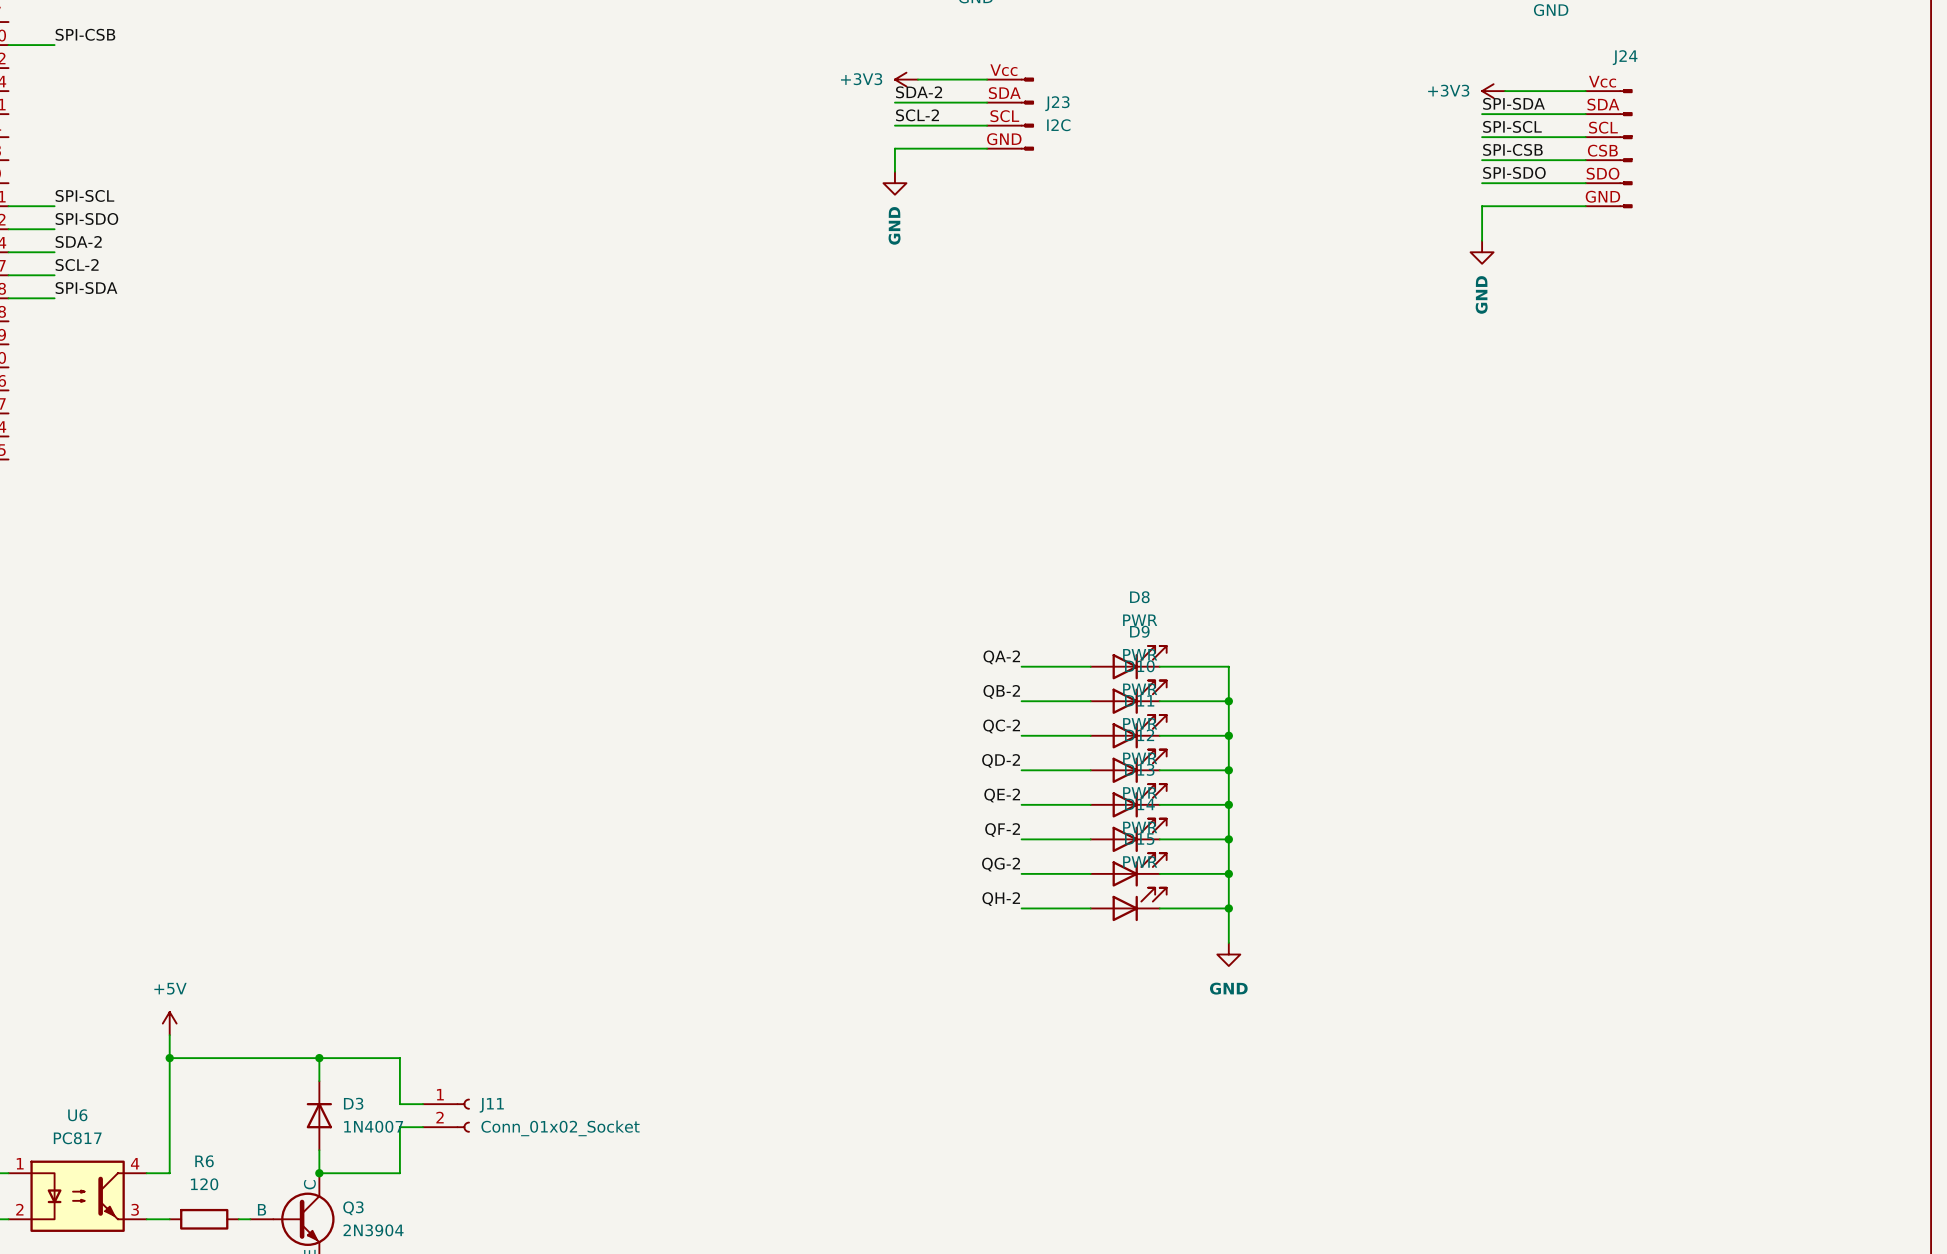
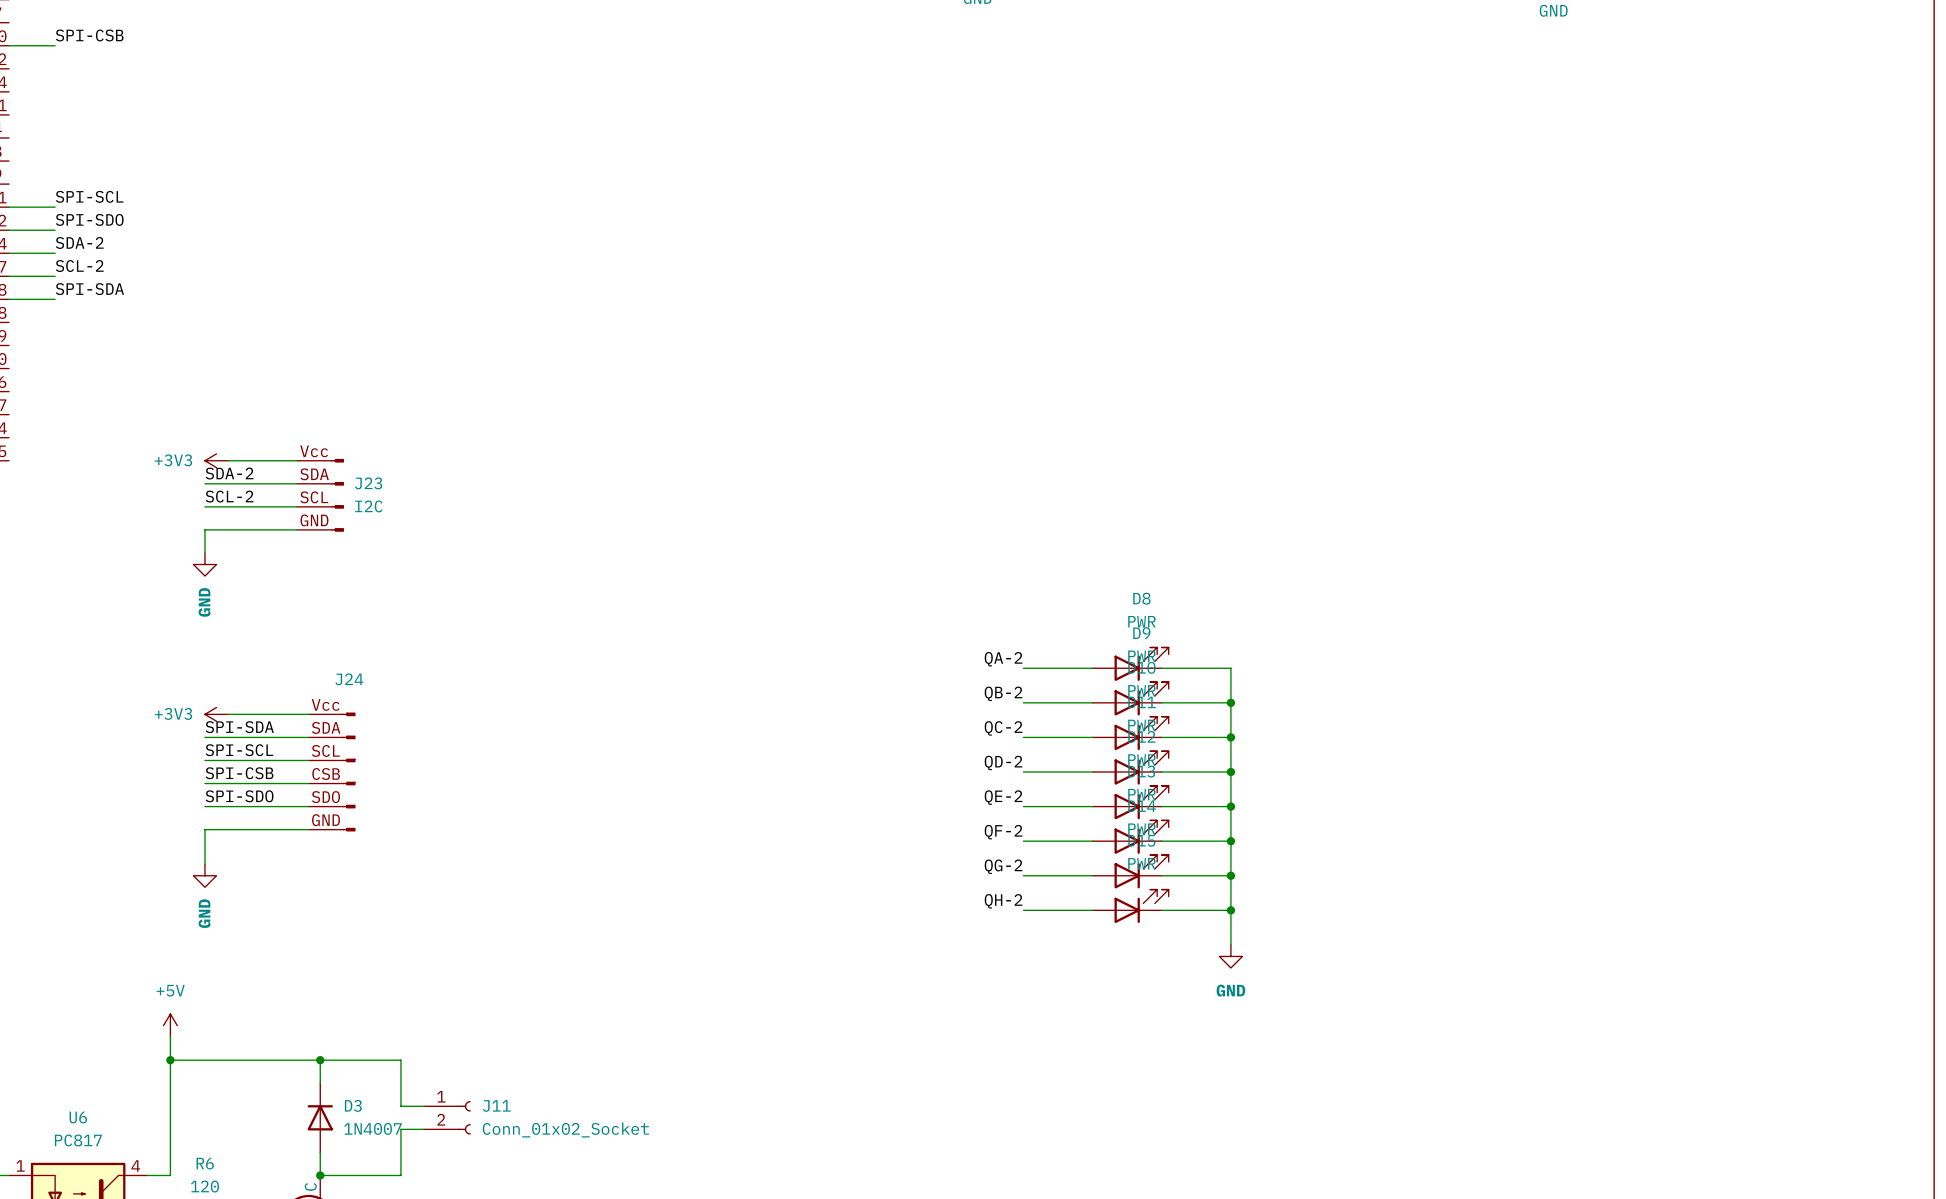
power symbol: +3V3 (906, 79) -> none
wire: (917, 79) (987, 79) -> none
power symbol: +3V3 (1493, 91) -> none
wire: (1505, 91) (1585, 91) -> none
label: SDA-2 (919, 92) -> none
wire: (894, 102) (987, 102) -> none
label: SPI-SDA (1513, 103) -> none
J23 position: (1010, 114) -> (320, 495)
wire: (1482, 114) (1585, 114) -> none
label: SCL-2 (917, 115) -> none
wire: (894, 125) (987, 125) -> none
label: SPI-SCL (1512, 126) -> none
wire: (1482, 137) (1585, 137) -> none
wire: (987, 148) (894, 148) (894, 171) -> none
J24 position: (1609, 148) -> (332, 772)
label: SPI-CSB (1512, 149) -> none
wire: (1482, 160) (1585, 160) -> none
label: SPI-SDO (1514, 172) -> none
power symbol: GND (894, 183) -> none
wire: (1482, 183) (1585, 183) -> none
wire: (1585, 206) (1482, 206) (1482, 240) -> none
power symbol: GND (1482, 252) -> none
power symbol: none -> +3V3 (216, 460)
wire: none -> (228, 460) (297, 460)
label: none -> SDA-2 (229, 473)
wire: none -> (204, 483) (297, 483)
label: none -> SCL-2 (229, 496)
wire: none -> (204, 506) (297, 506)
wire: none -> (297, 529) (204, 529) (204, 552)
power symbol: none -> GND (204, 564)
power symbol: none -> +3V3 (216, 714)
wire: none -> (228, 714) (308, 714)
label: none -> SPI-SDA (239, 727)
wire: none -> (204, 737) (308, 737)
label: none -> SPI-SCL (239, 750)
wire: none -> (204, 760) (308, 760)
label: none -> SPI-CSB (239, 773)
wire: none -> (204, 783) (308, 783)
label: none -> SPI-SDO (239, 796)
wire: none -> (204, 806) (308, 806)
wire: none -> (308, 829) (204, 829) (204, 864)
power symbol: none -> GND (204, 875)

